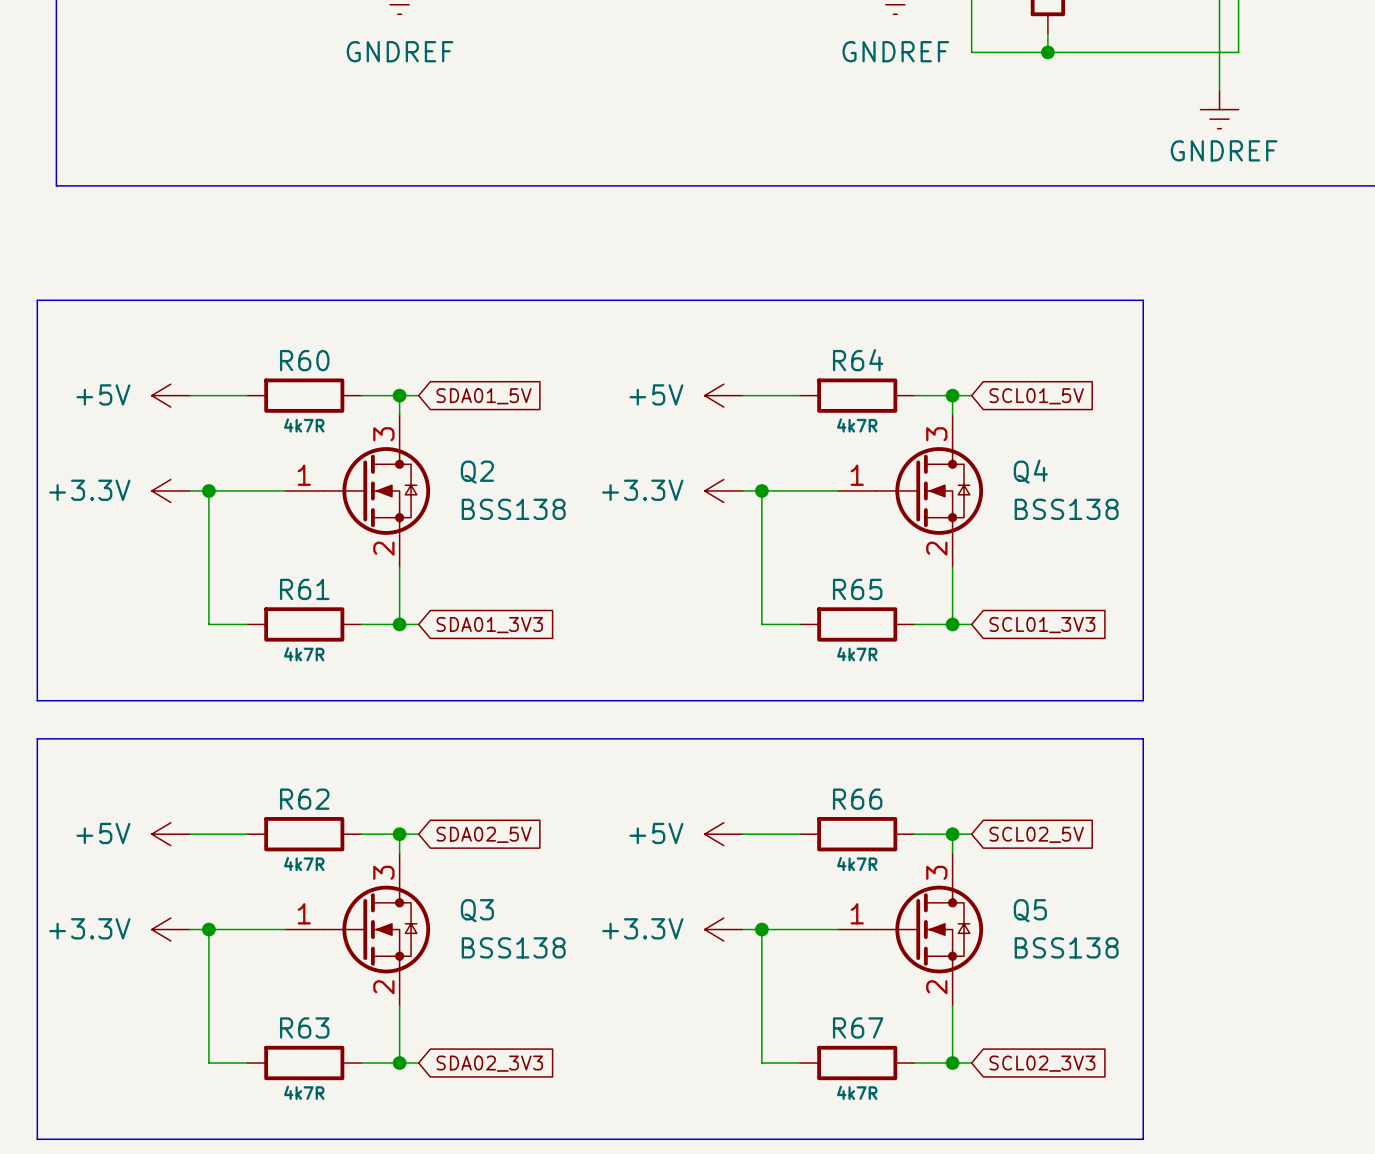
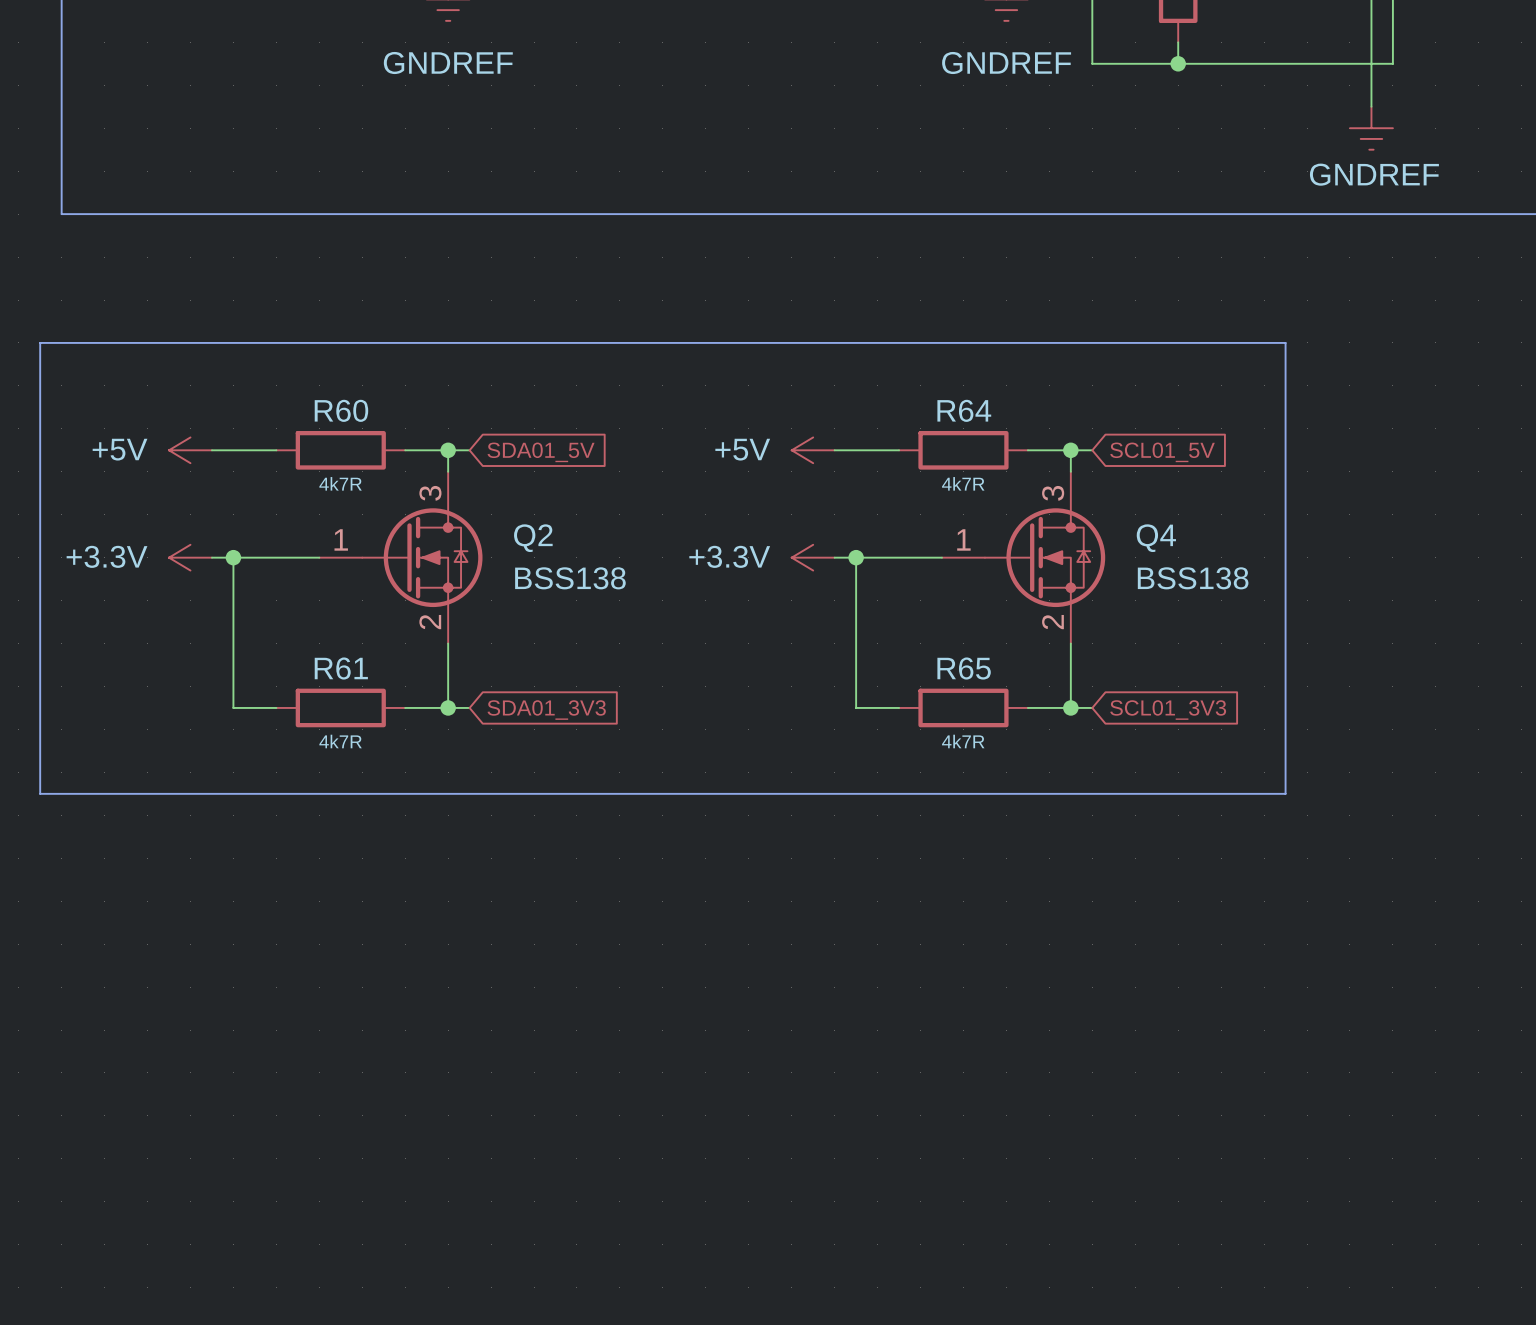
line: (37, 738) (37, 1139) (1143, 1139) (1143, 738) (37, 738) -> none
power symbol: +5V (170, 834) -> none
wire: (189, 834) (247, 834) -> none
R62: 4k7R (304, 834) -> none
wire: (361, 834) (418, 834) -> none
wire: (399, 834) (399, 853) -> none
junction: (399, 834) -> none
global label: SDA02_5V (484, 834) -> none
power symbol: +5V (723, 834) -> none
wire: (742, 834) (800, 834) -> none
R66: 4k7R (857, 834) -> none
wire: (914, 834) (971, 834) -> none
wire: (952, 834) (952, 853) -> none
junction: (952, 834) -> none
global label: SCL02_5V (1036, 834) -> none
power symbol: +3.3V (170, 929) -> none
wire: (189, 929) (285, 929) -> none
wire: (208, 929) (208, 1063) (247, 1063) -> none
junction: (208, 929) -> none
Q3: BSS138 (357, 929) -> none
power symbol: +3.3V (723, 929) -> none
wire: (742, 929) (838, 929) -> none
wire: (761, 929) (761, 1063) (800, 1063) -> none
junction: (761, 929) -> none
Q5: BSS138 (910, 929) -> none
wire: (399, 1005) (399, 1063) -> none
wire: (952, 1005) (952, 1063) -> none
R63: 4k7R (304, 1063) -> none
wire: (361, 1063) (418, 1063) -> none
junction: (399, 1063) -> none
global label: SDA02_3V3 (489, 1063) -> none
R67: 4k7R (857, 1063) -> none
wire: (914, 1063) (971, 1063) -> none
junction: (952, 1063) -> none
global label: SCL02_3V3 (1042, 1063) -> none

